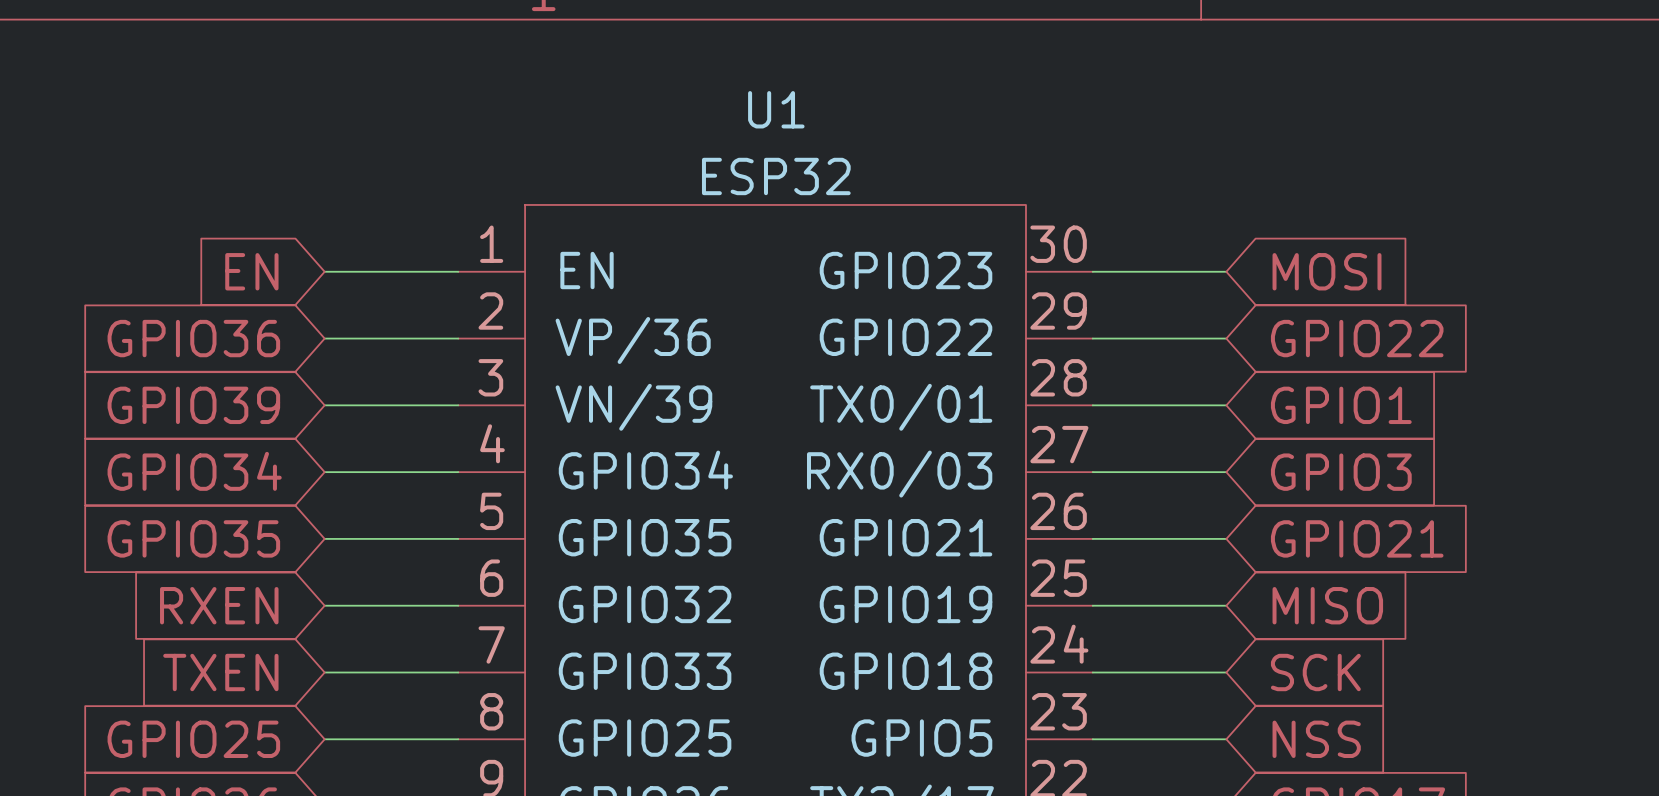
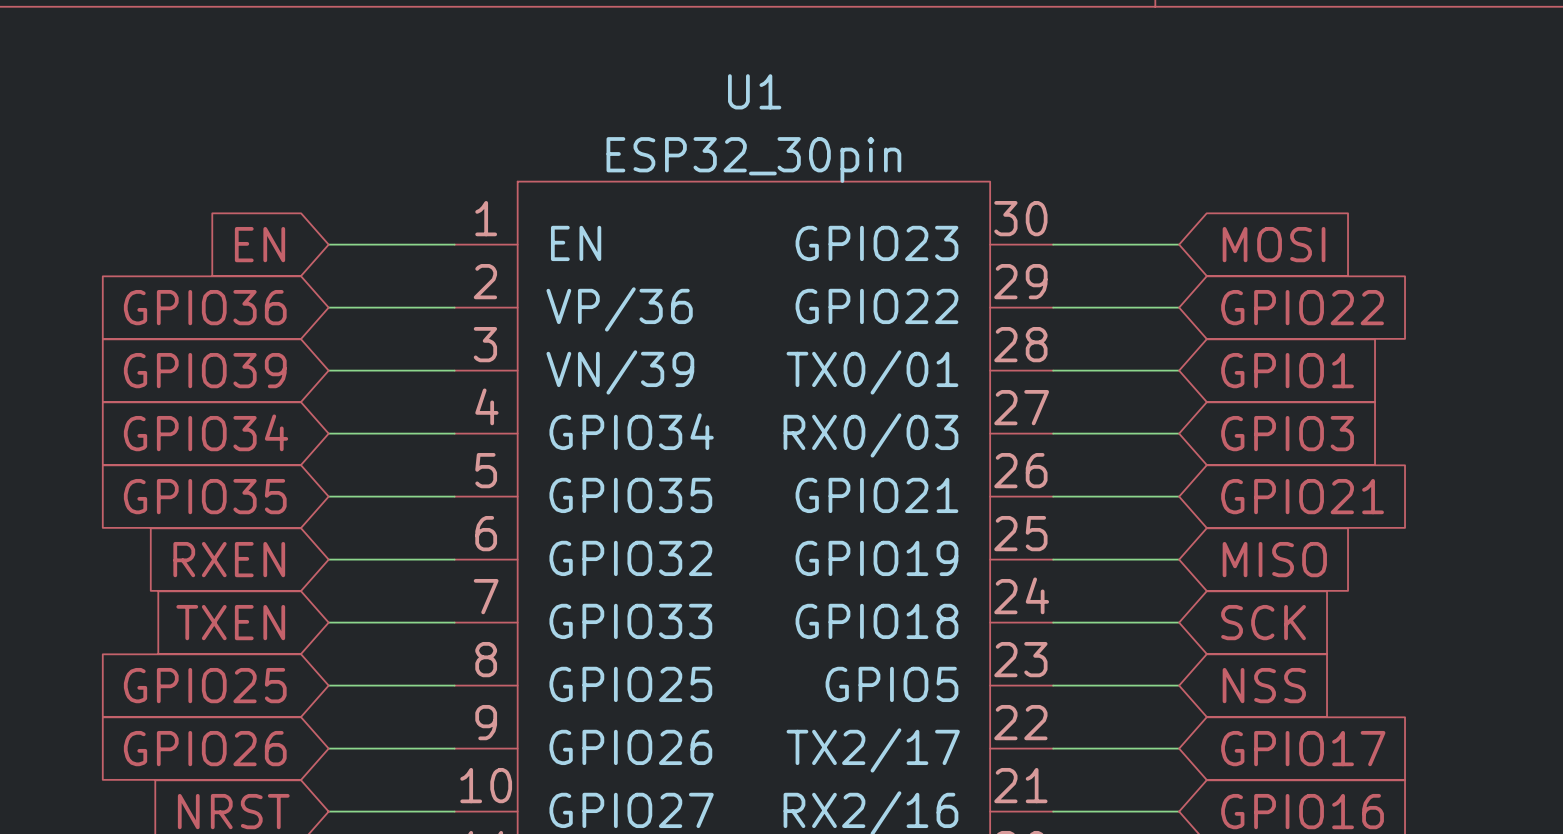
U1 value: ESP32 (776, 176) -> ESP32_30pin (753, 160)

